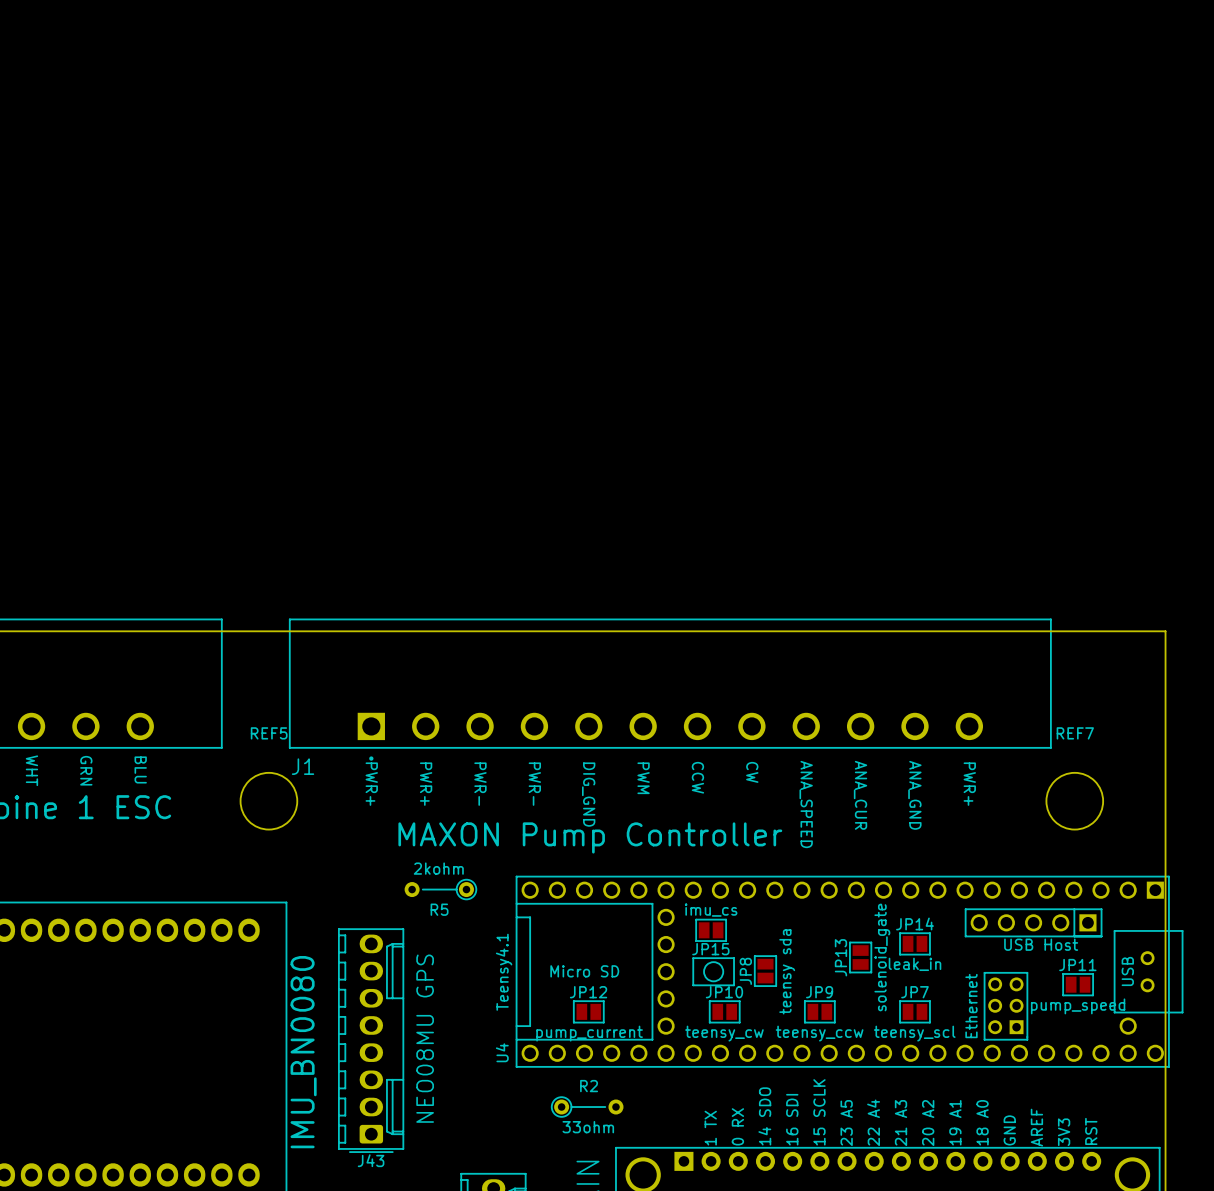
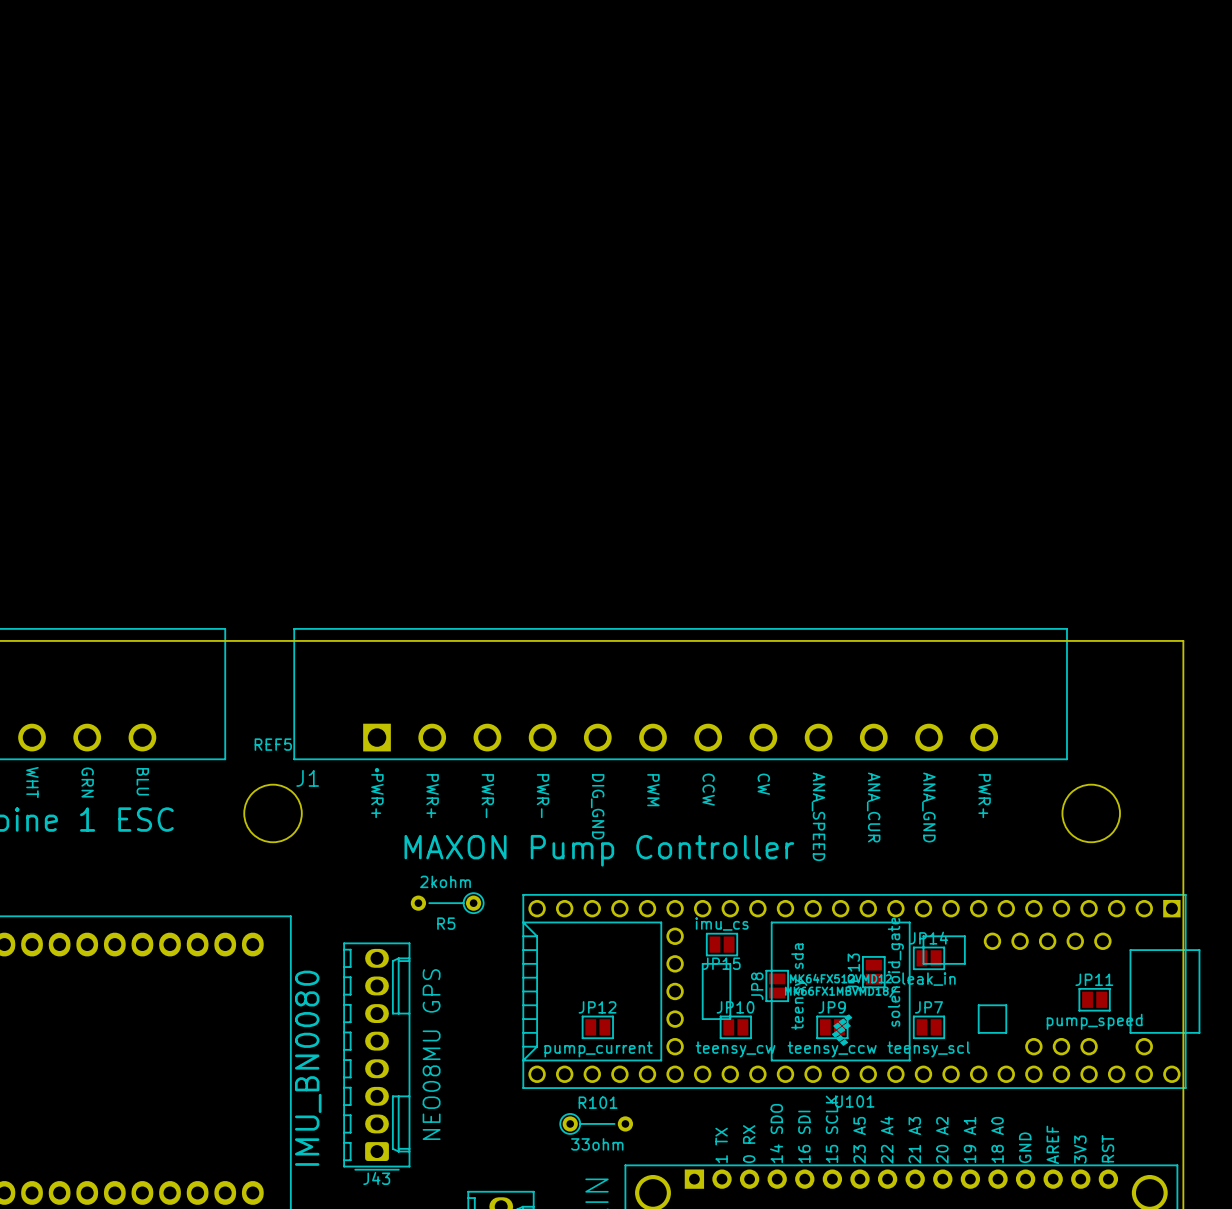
REF7 name: REF7 (1075, 733) -> none
U4: Teensy4.1 (849, 971) -> none
U101: none -> (861, 991)
R2 name: R2 (589, 1086) -> R101 (598, 1102)

